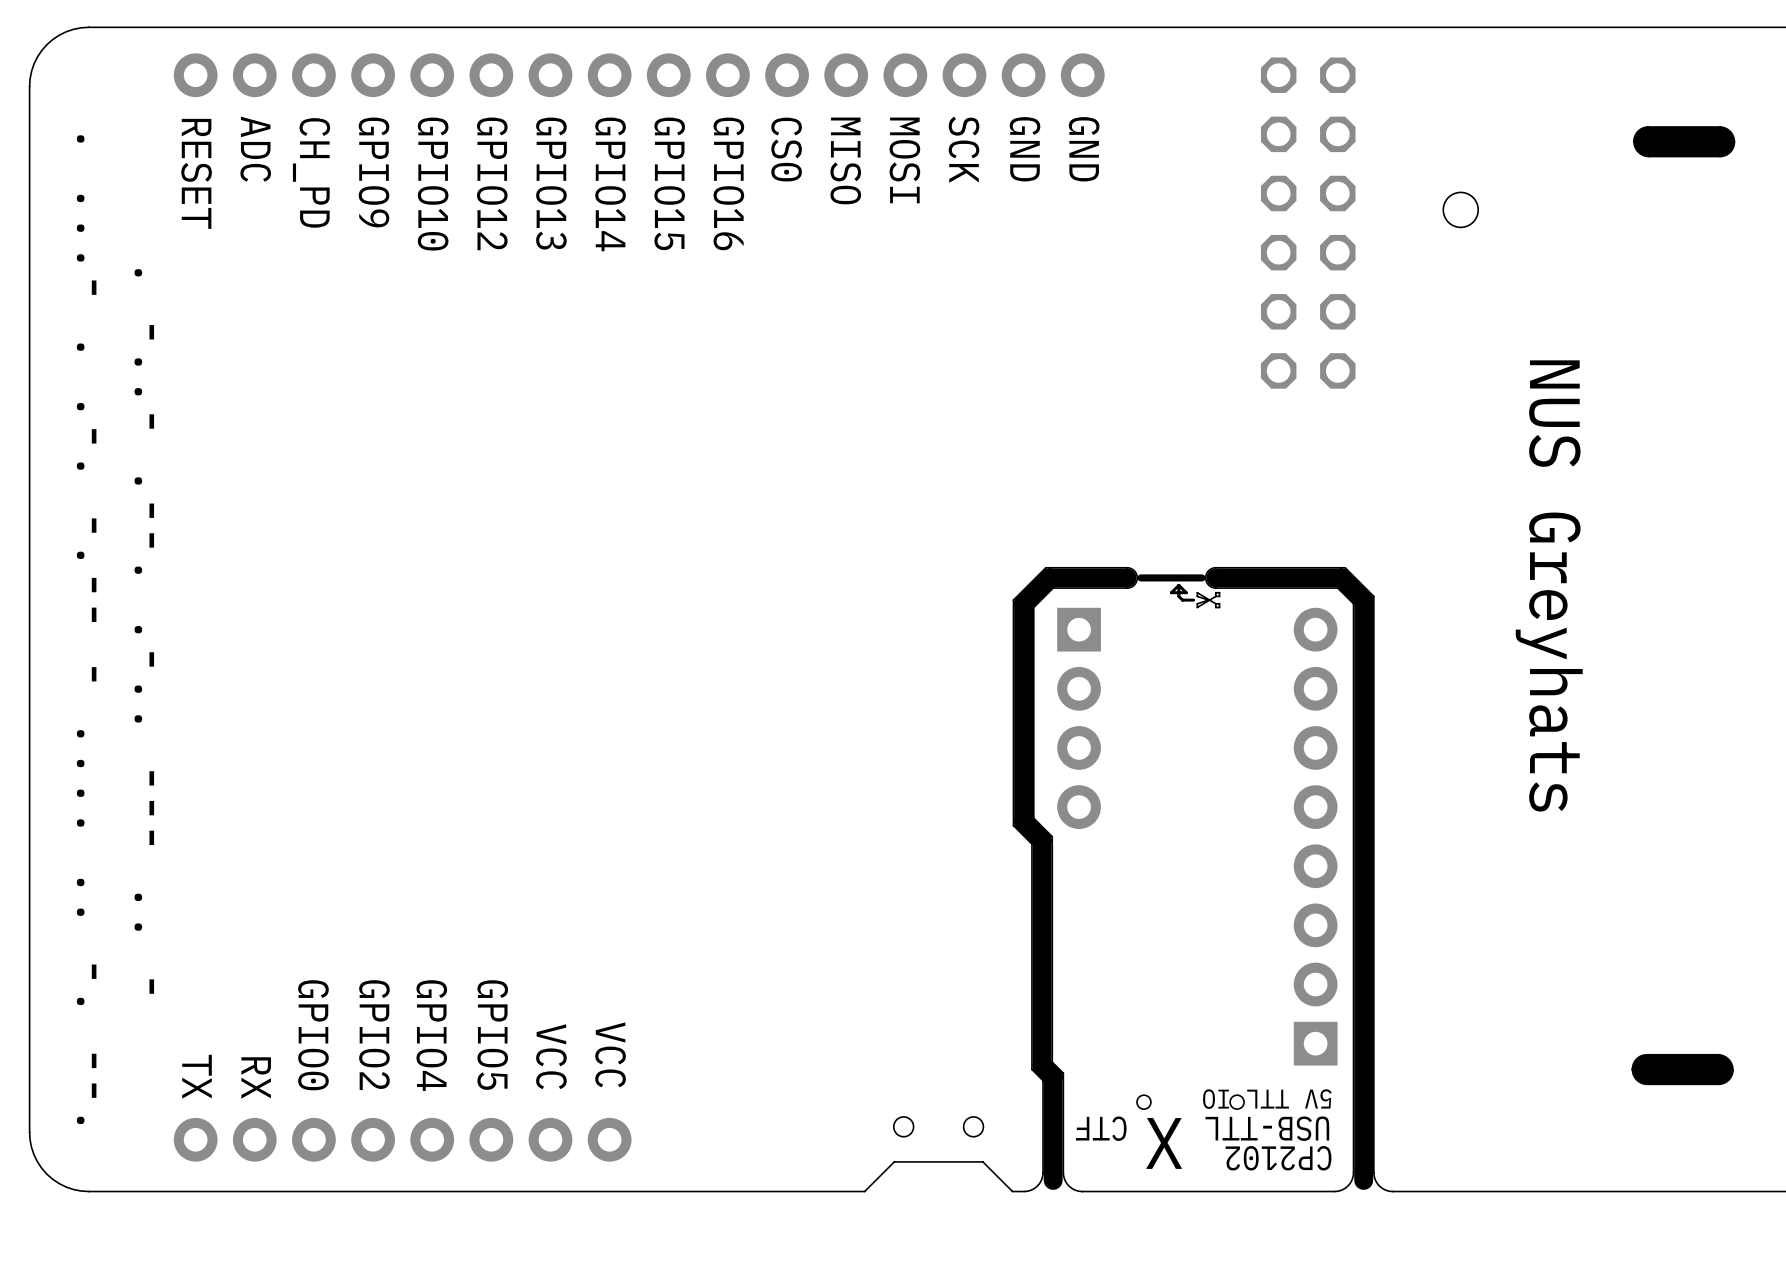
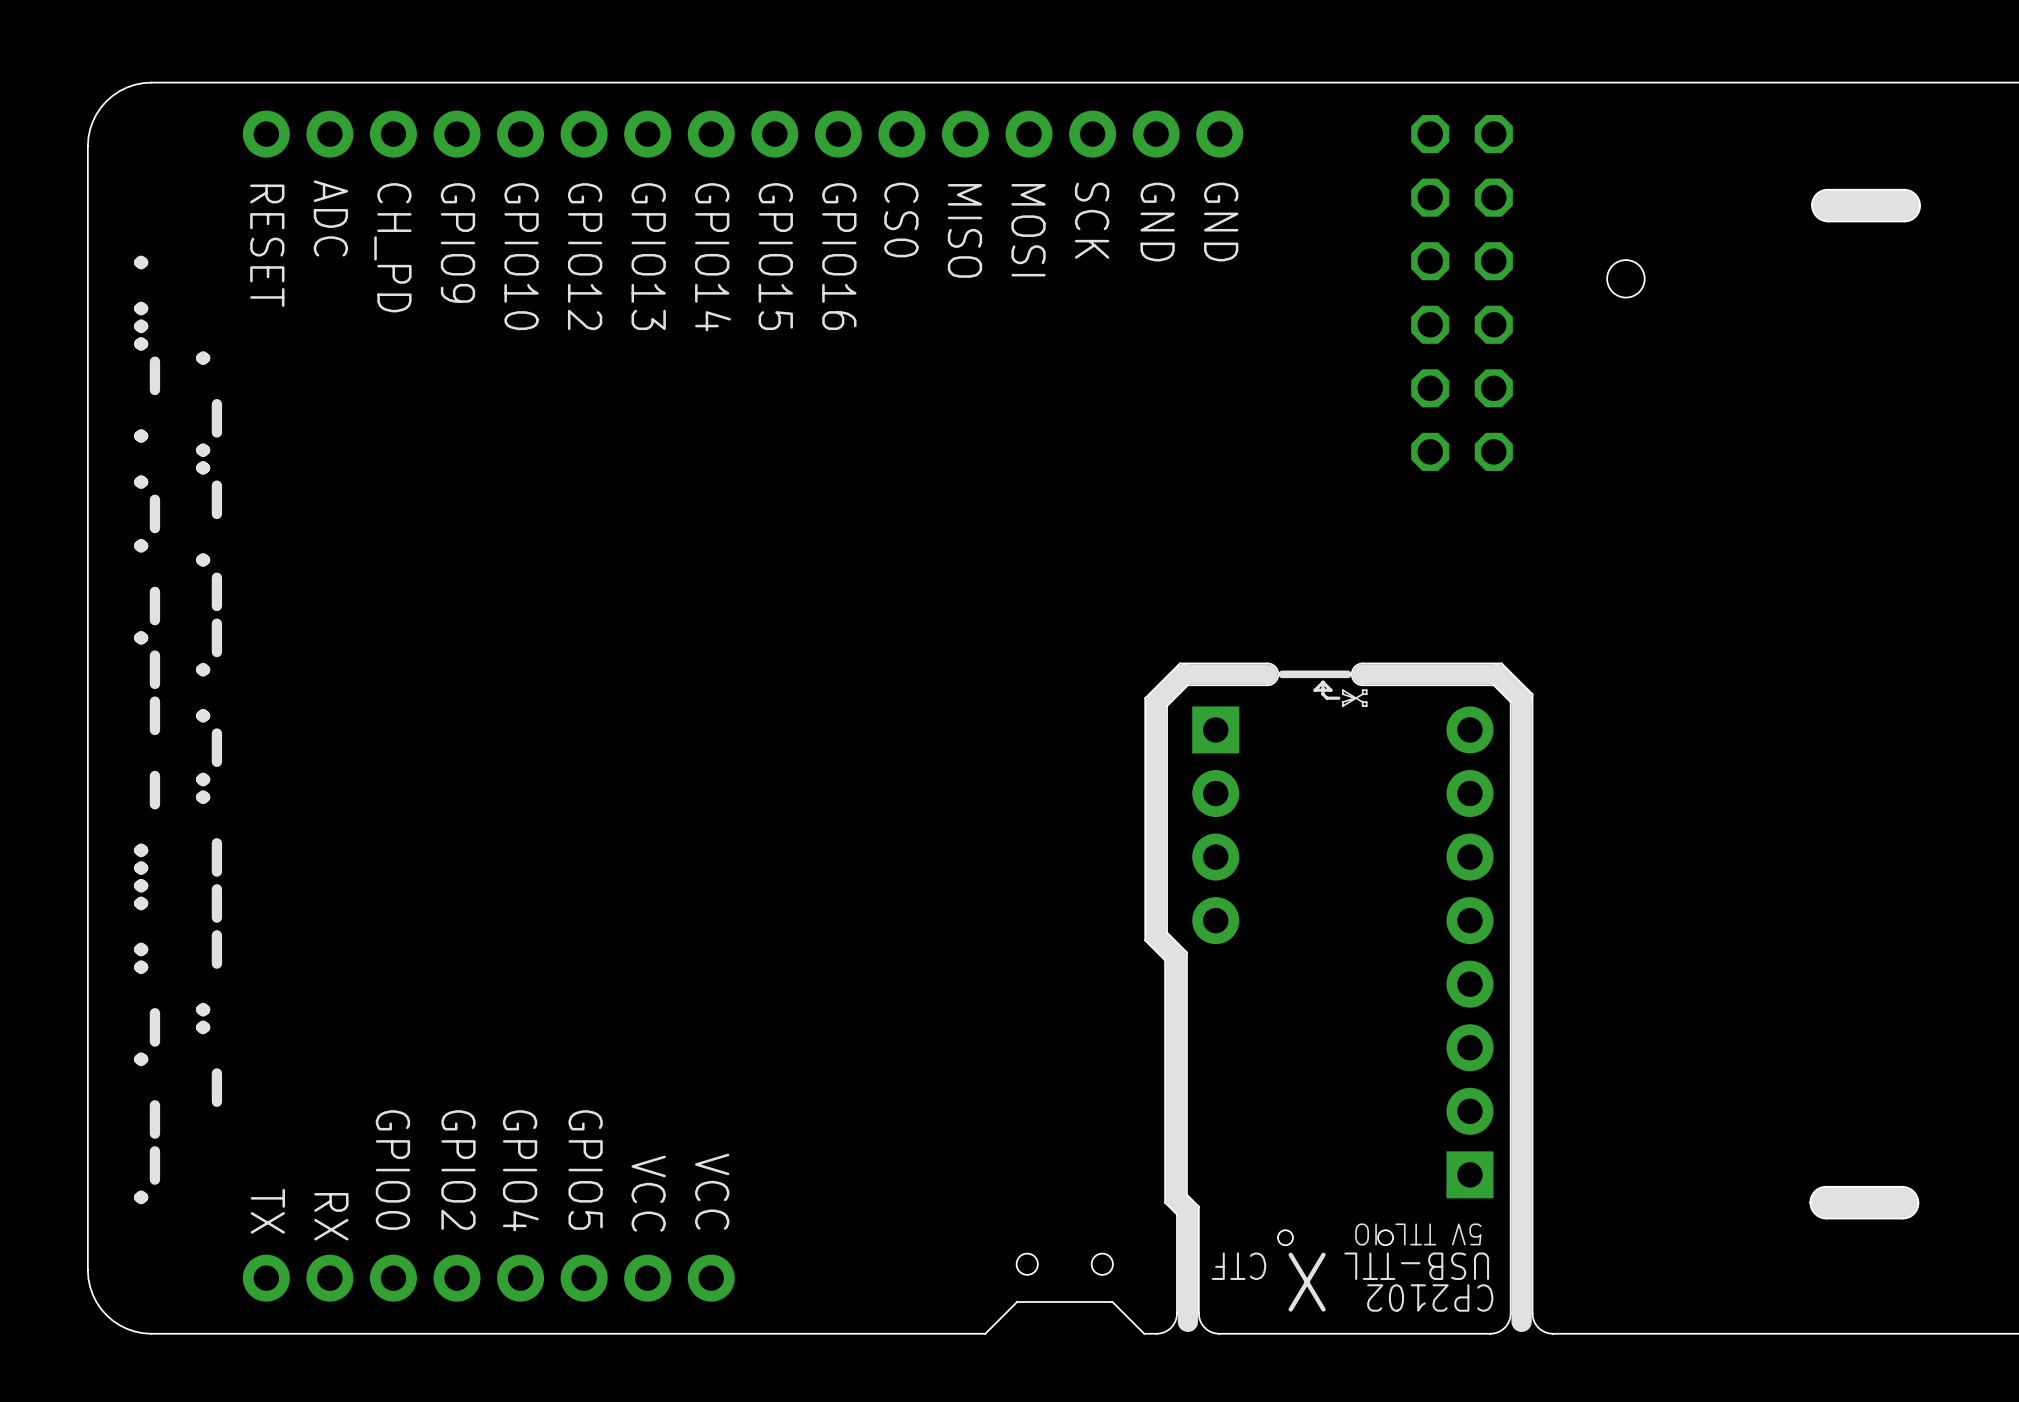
text: NUS Greyhats (1549, 585) -> none

